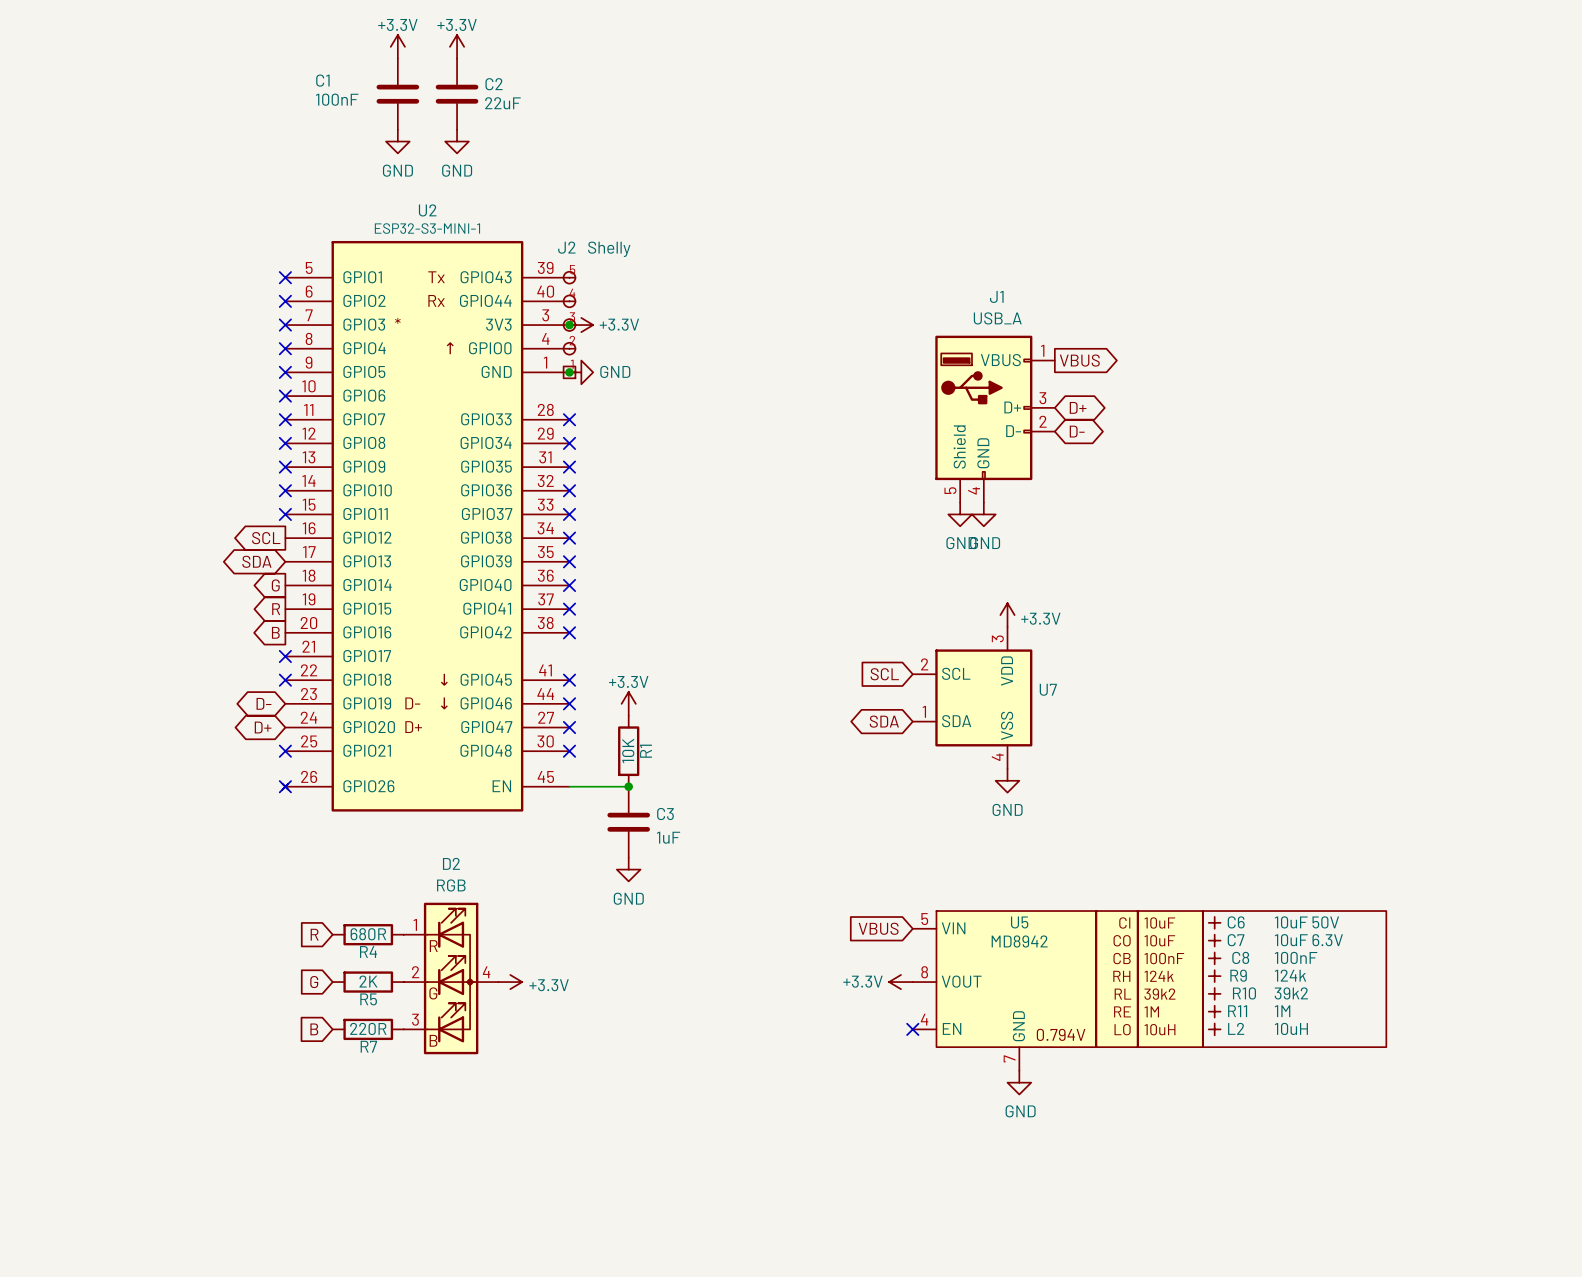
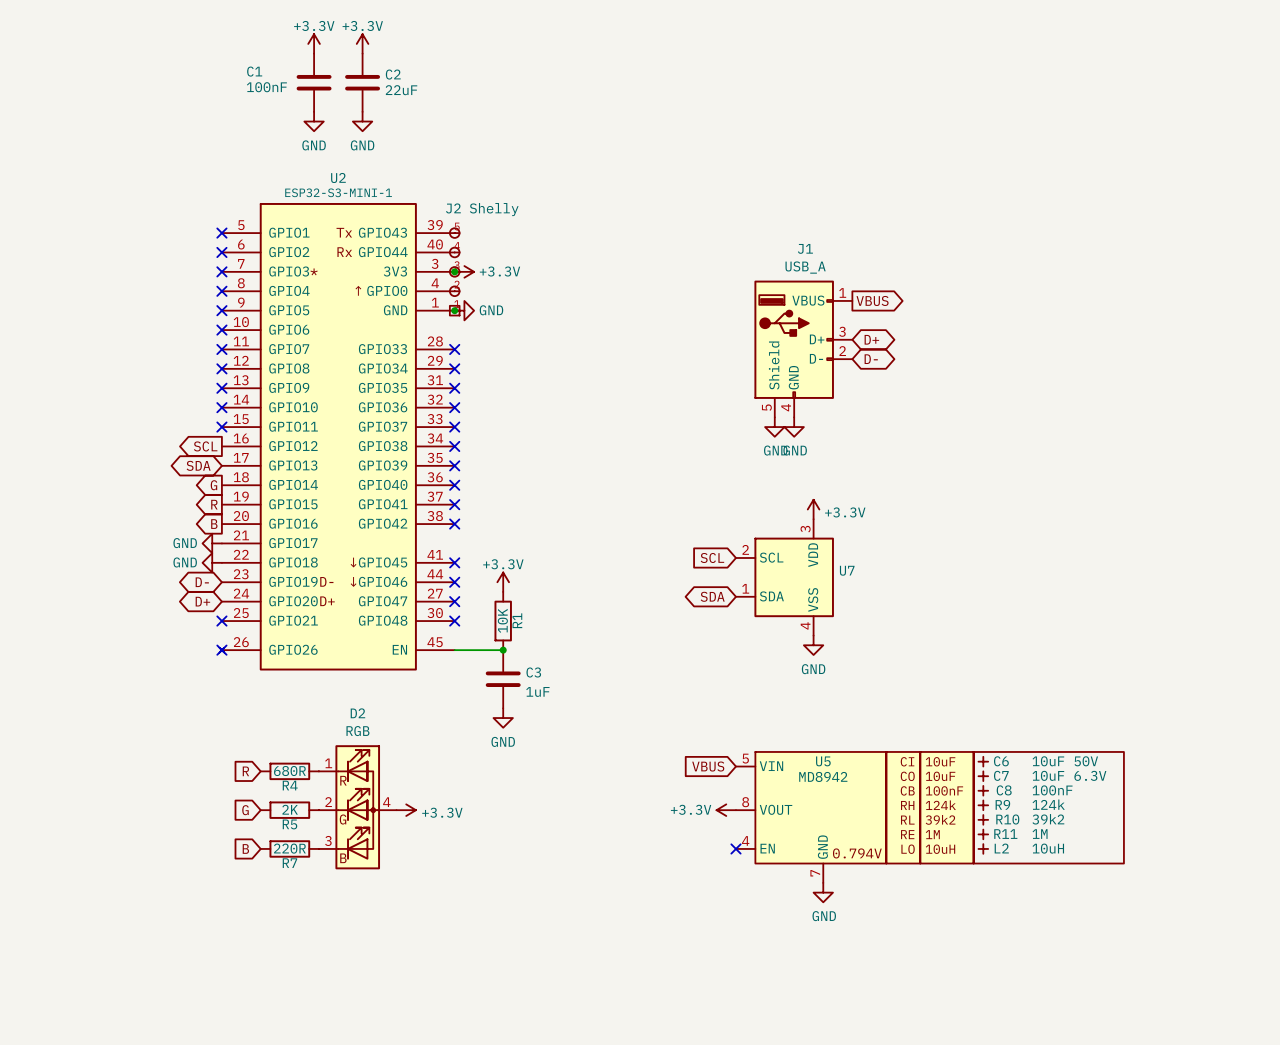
power symbol: none -> GND (212, 543)
no-connect mark: (285, 656) -> none
power symbol: none -> GND (212, 562)
no-connect mark: (285, 680) -> none

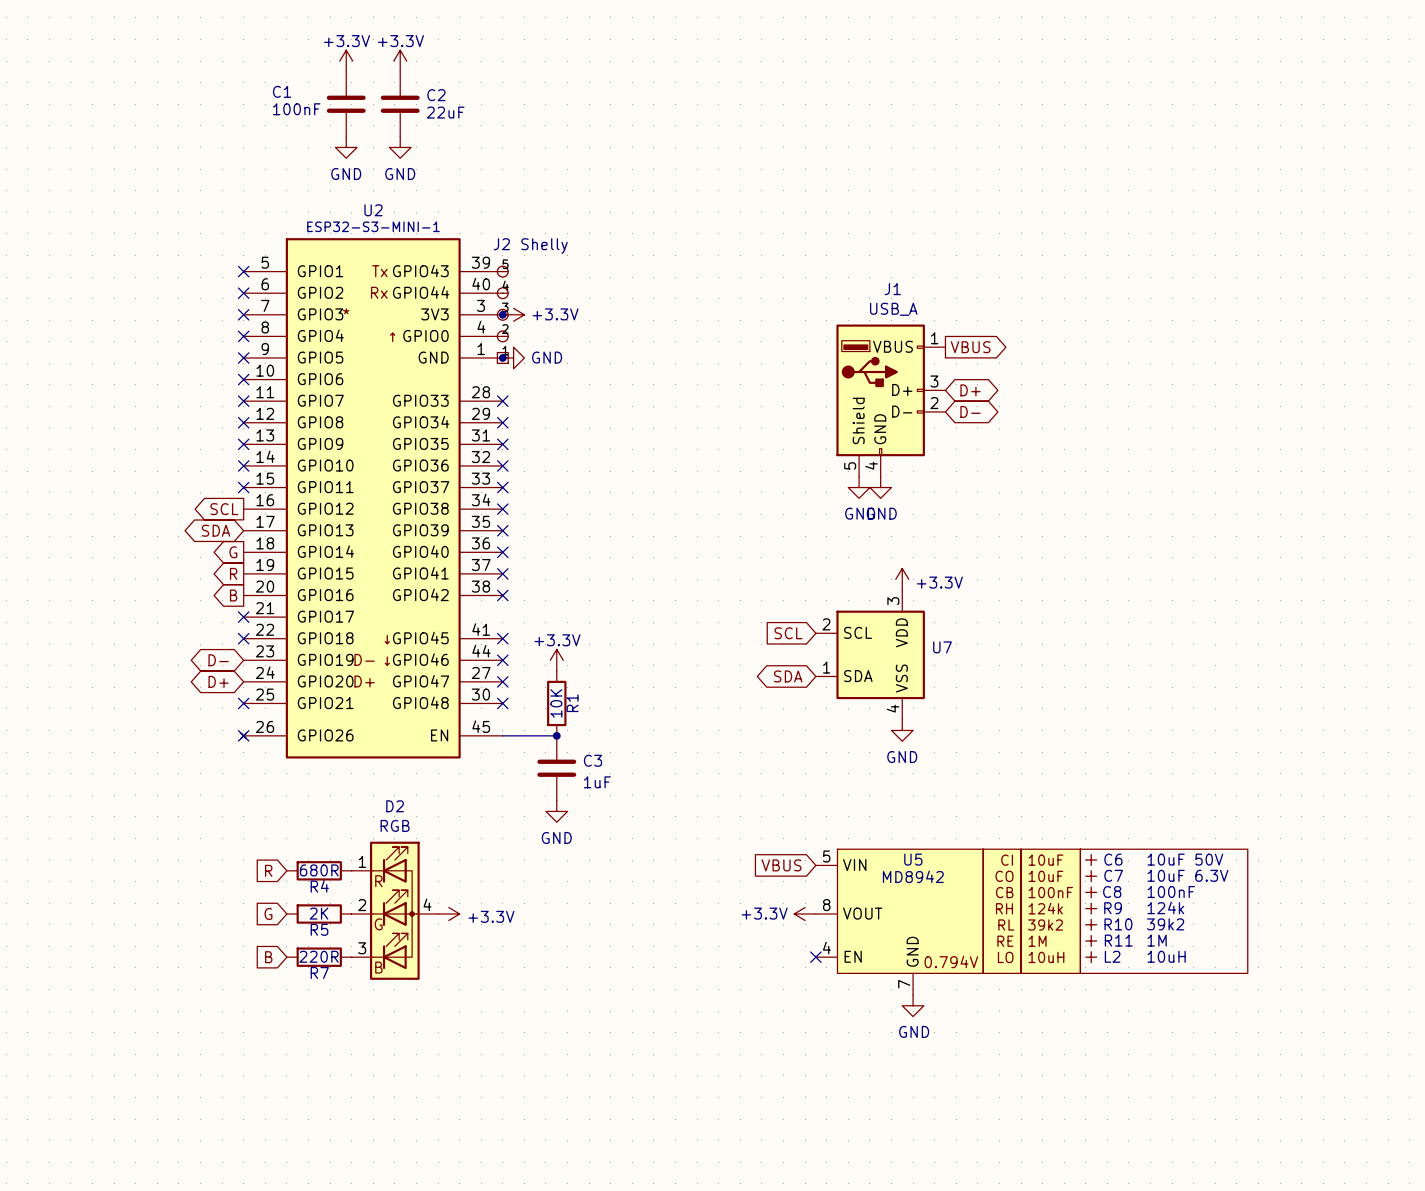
power symbol: GND (212, 543) -> none
no-connect mark: none -> (243, 617)
power symbol: GND (212, 562) -> none
no-connect mark: none -> (243, 638)

